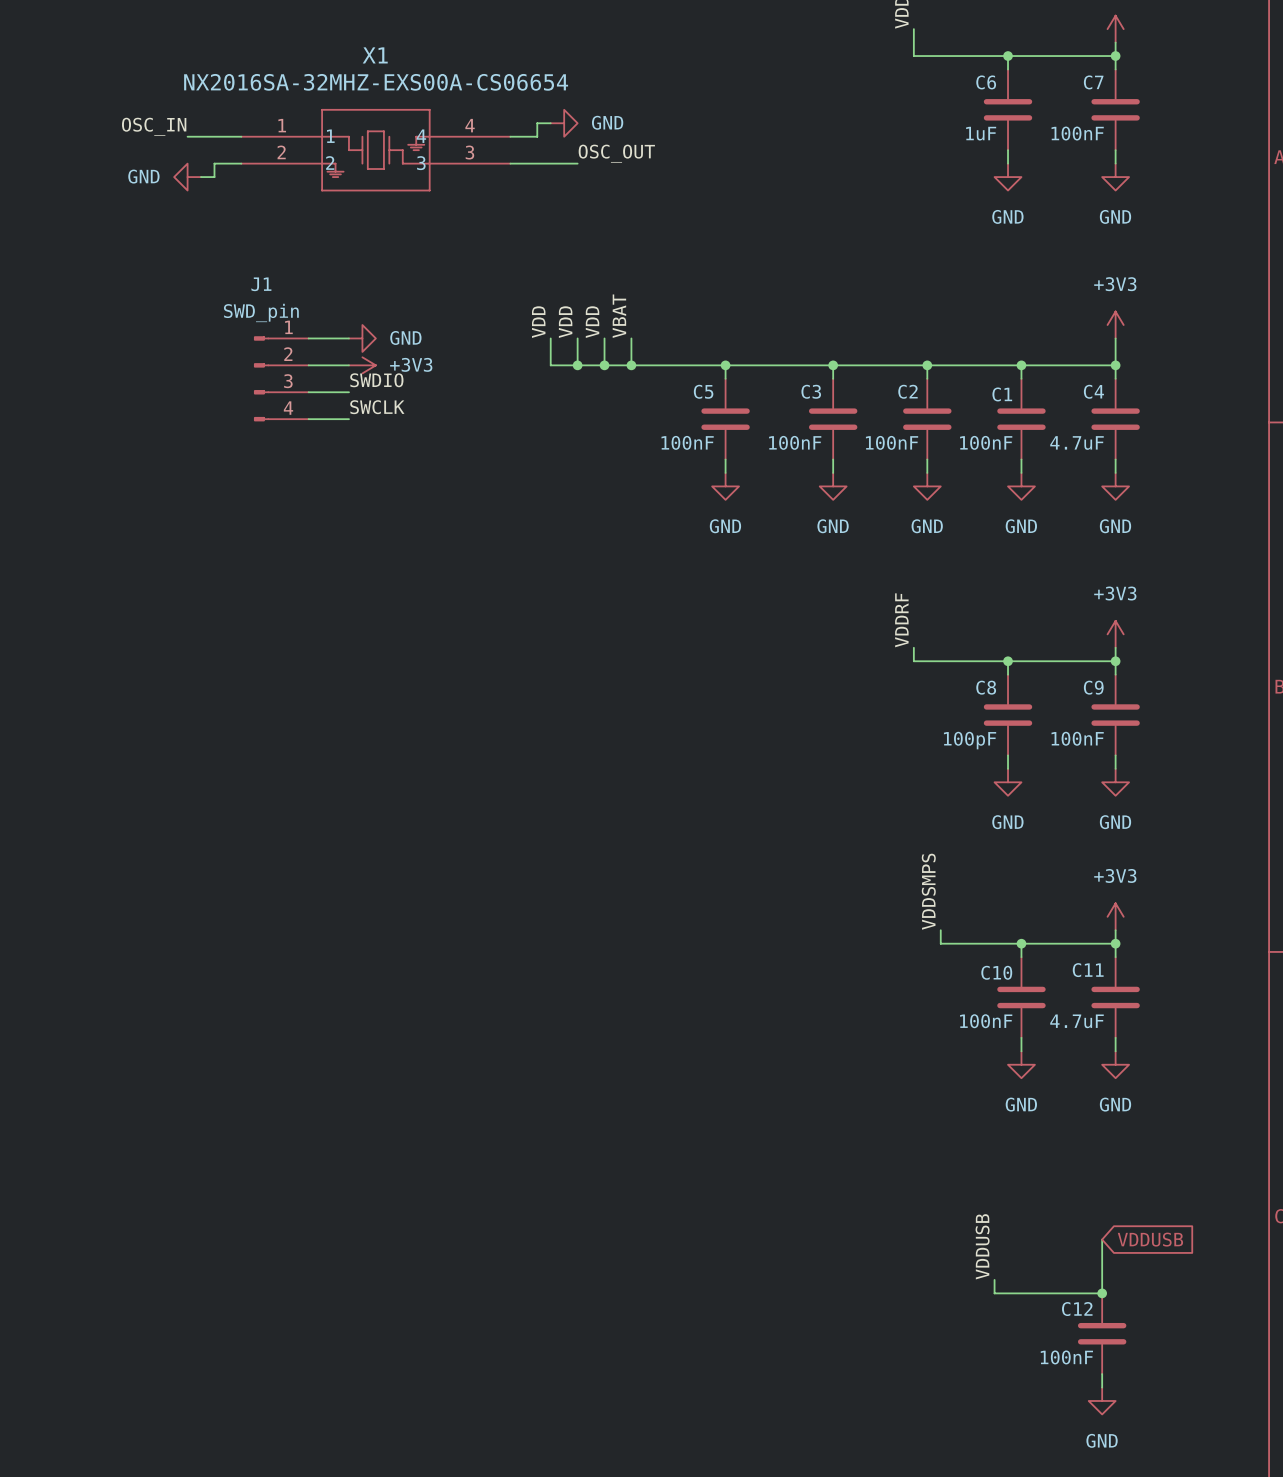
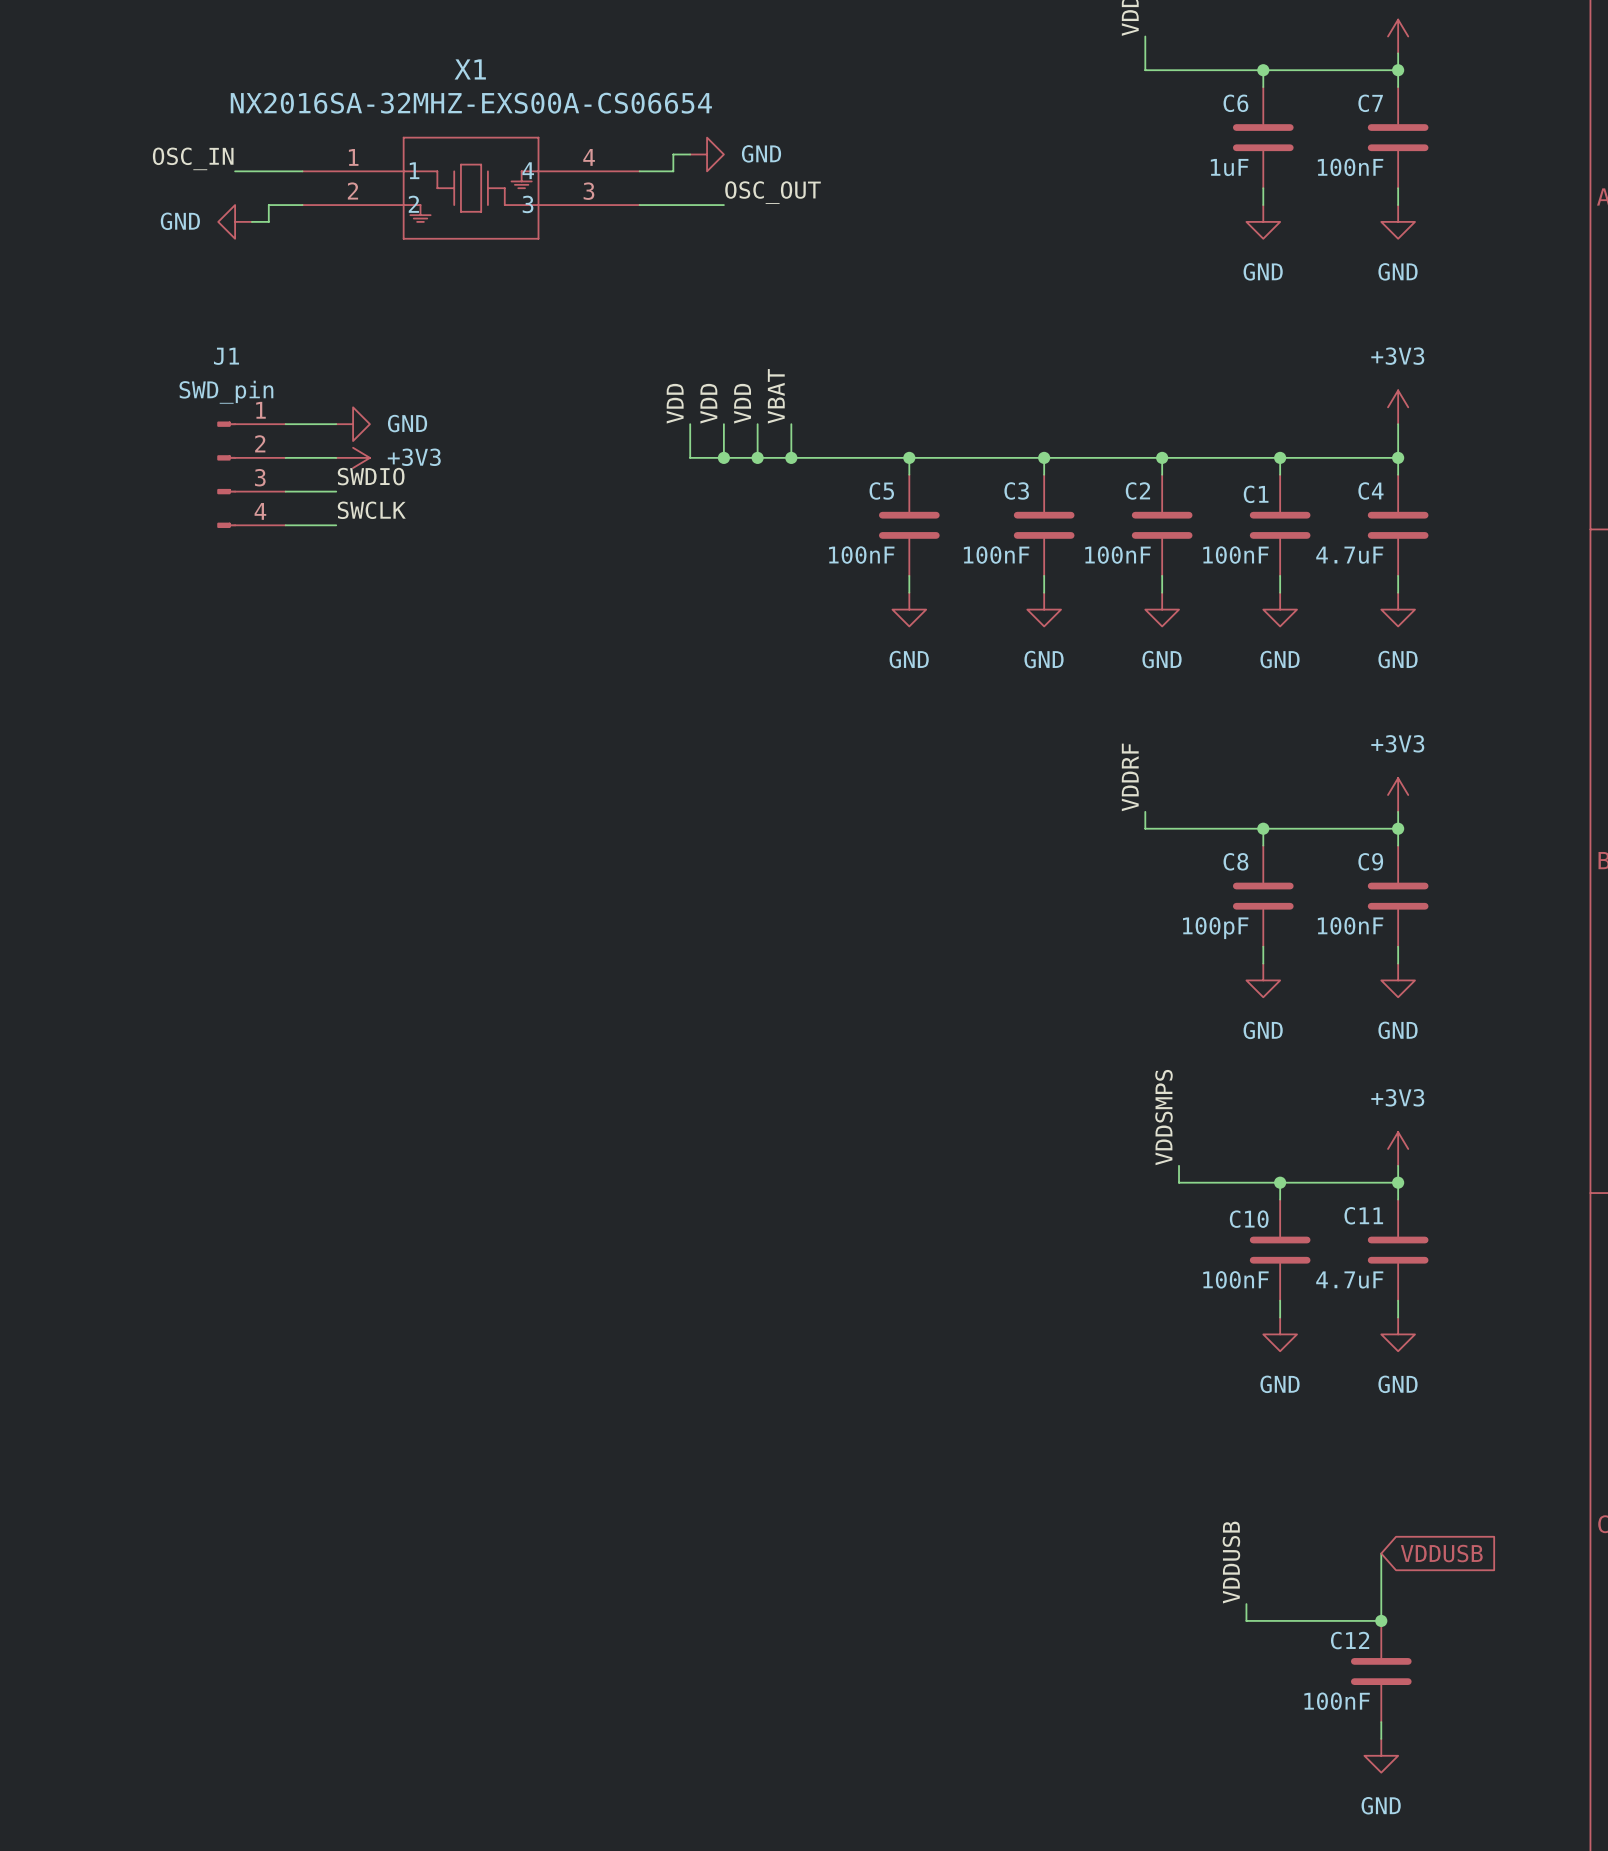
wire: (308, 338) (348, 338) -> (285, 424) (336, 424)
power symbol position: GND (362, 338) -> GND (353, 424)
wire: (308, 365) (348, 365) -> (285, 457) (336, 457)
power symbol position: +3V3 (362, 365) -> +3V3 (353, 457)
J1 position: (281, 378) -> (251, 474)
label position: SWDIO (376, 380) -> SWDIO (371, 476)
wire: (308, 392) (348, 392) -> (285, 491) (336, 491)
label position: SWCLK (377, 407) -> SWCLK (371, 510)
wire: (308, 419) (348, 419) -> (285, 525) (336, 525)

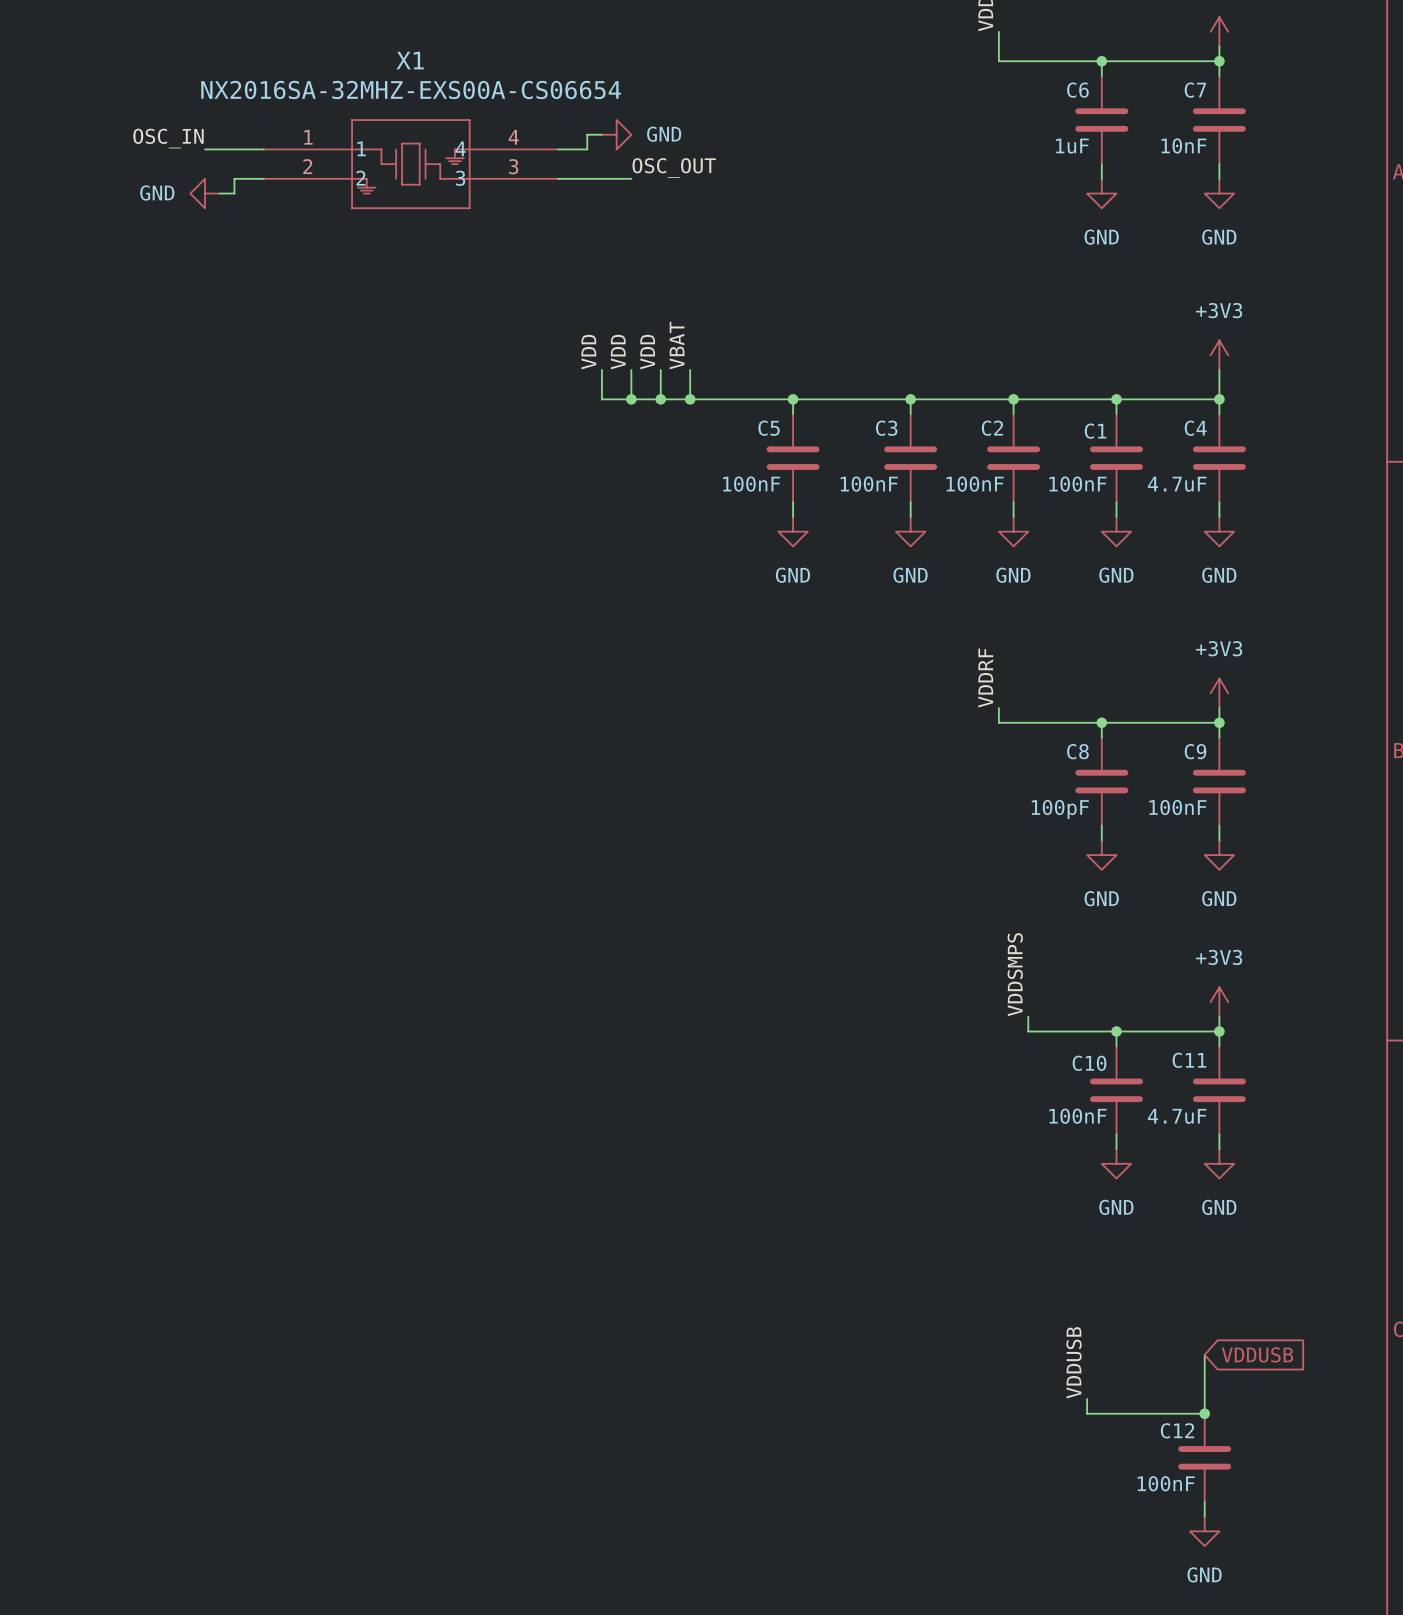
C7 value: 100nF (1350, 167) -> 10nF (1183, 145)
wire: (285, 424) (336, 424) -> none
power symbol: GND (353, 424) -> none
wire: (285, 457) (336, 457) -> none
power symbol: +3V3 (353, 457) -> none
J1: SWD_pin (251, 474) -> none
label: SWDIO (371, 476) -> none
wire: (285, 491) (336, 491) -> none
label: SWCLK (371, 510) -> none
wire: (285, 525) (336, 525) -> none

